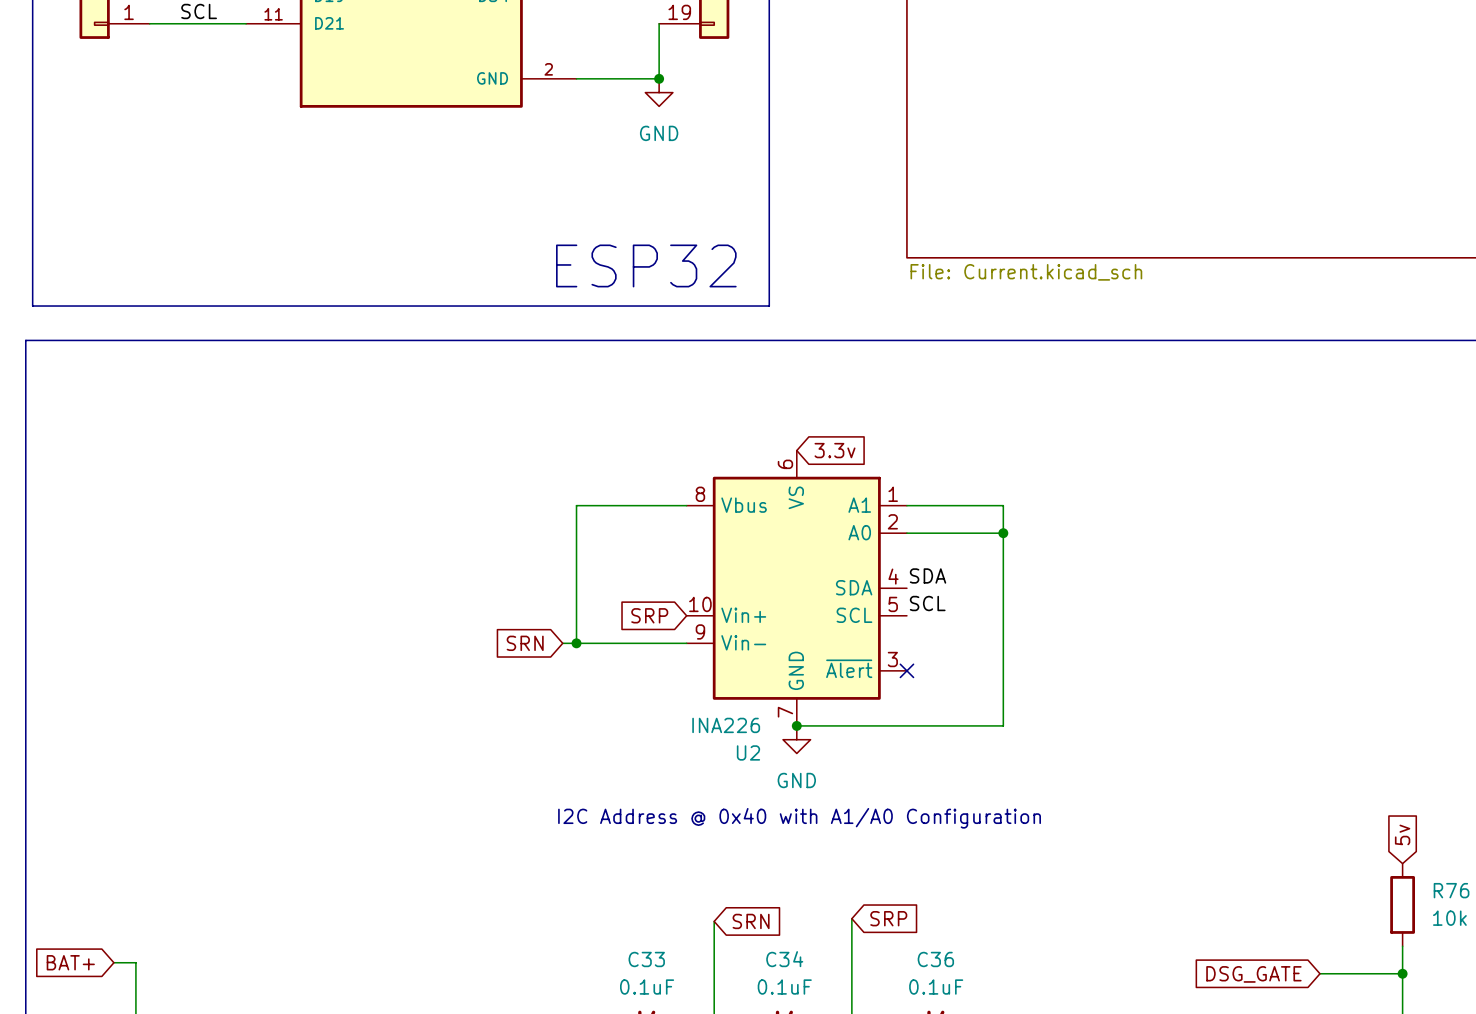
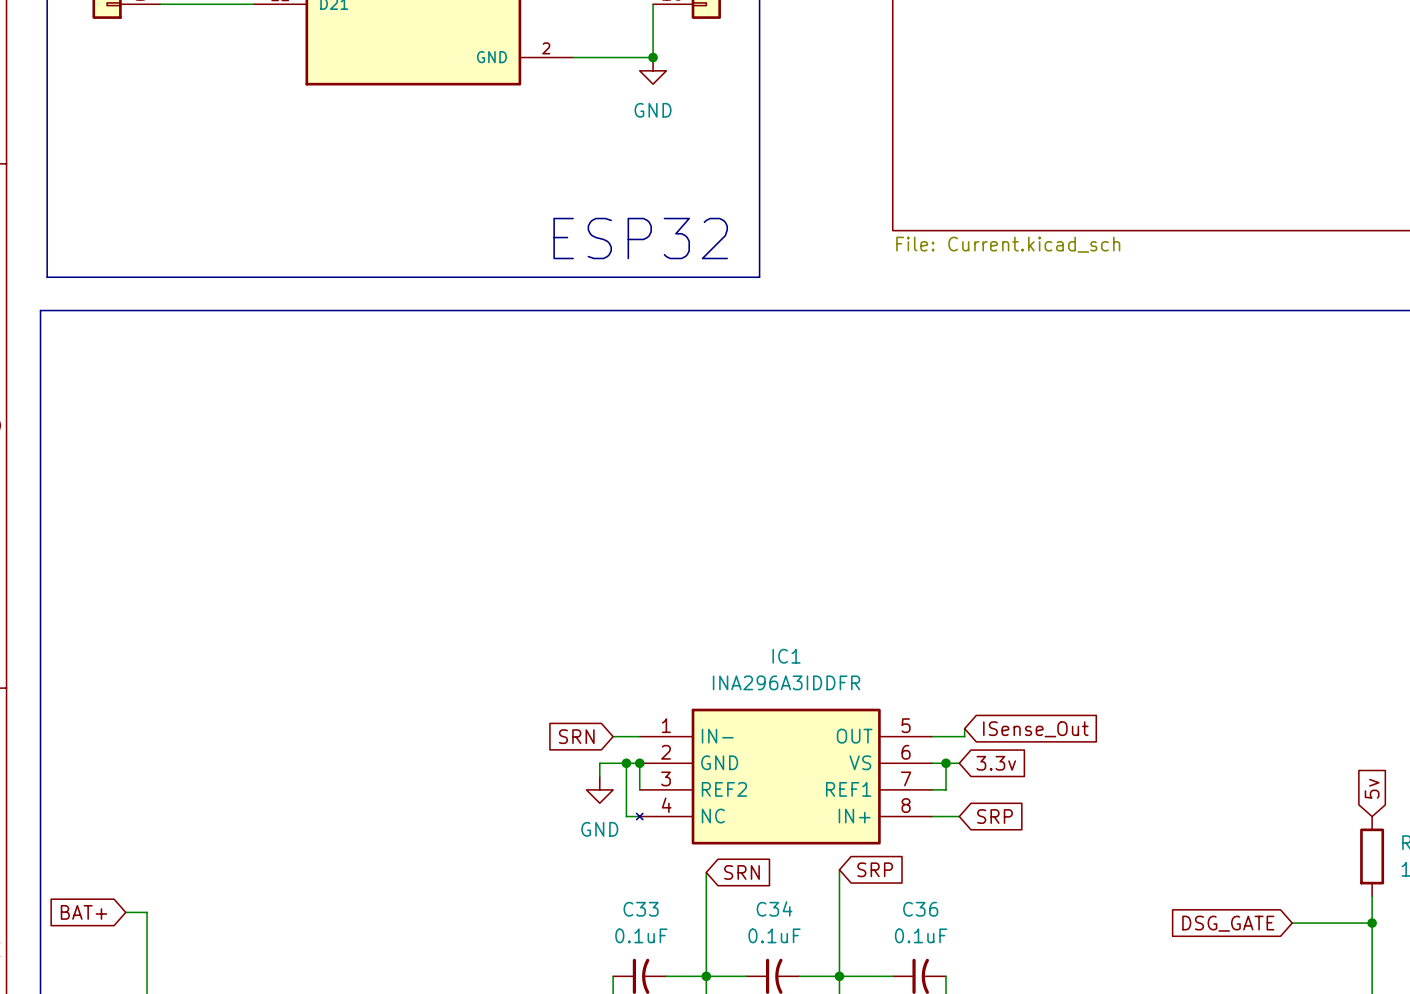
global label: 3.3v (835, 450) -> none
wire: (686, 505) (576, 505) (576, 643) -> none
wire: (906, 505) (1003, 505) (1003, 725) (796, 725) -> none
wire: (906, 533) (1003, 533) -> none
junction: (1003, 533) -> none
label: SDA (928, 575) -> none
U2: INA226 (796, 588) -> none
label: SCL (927, 603) -> none
global label: SRP (649, 615) -> none
global label position: SRN (525, 643) -> SRN (576, 736)
wire: (562, 643) (686, 643) -> none
junction: (576, 643) -> none
no-connect mark: (906, 670) -> none
junction: (796, 725) -> none
power symbol position: GND (796, 739) -> GND (599, 789)
wire: none -> (964, 728) (964, 736) (932, 736)
global label: none -> ISense_Out (1035, 729)
wire: none -> (613, 736) (639, 736)
wire: none -> (626, 763) (626, 816) (639, 816)
junction: none -> (626, 763)
junction: none -> (639, 763)
wire: none -> (932, 763) (959, 763)
wire: none -> (946, 763) (946, 789) (932, 789)
junction: none -> (946, 763)
global label: none -> 3.3v (996, 763)
text: I2C Address @ 0x40 with A1/A0 Configuration (799, 818) -> none
wire: none -> (599, 776) (599, 763) (639, 763) (639, 789)
IC1: none -> INA296A3IDDFR (784, 776)
wire: none -> (932, 816) (959, 816)
global label: none -> SRP (995, 816)

